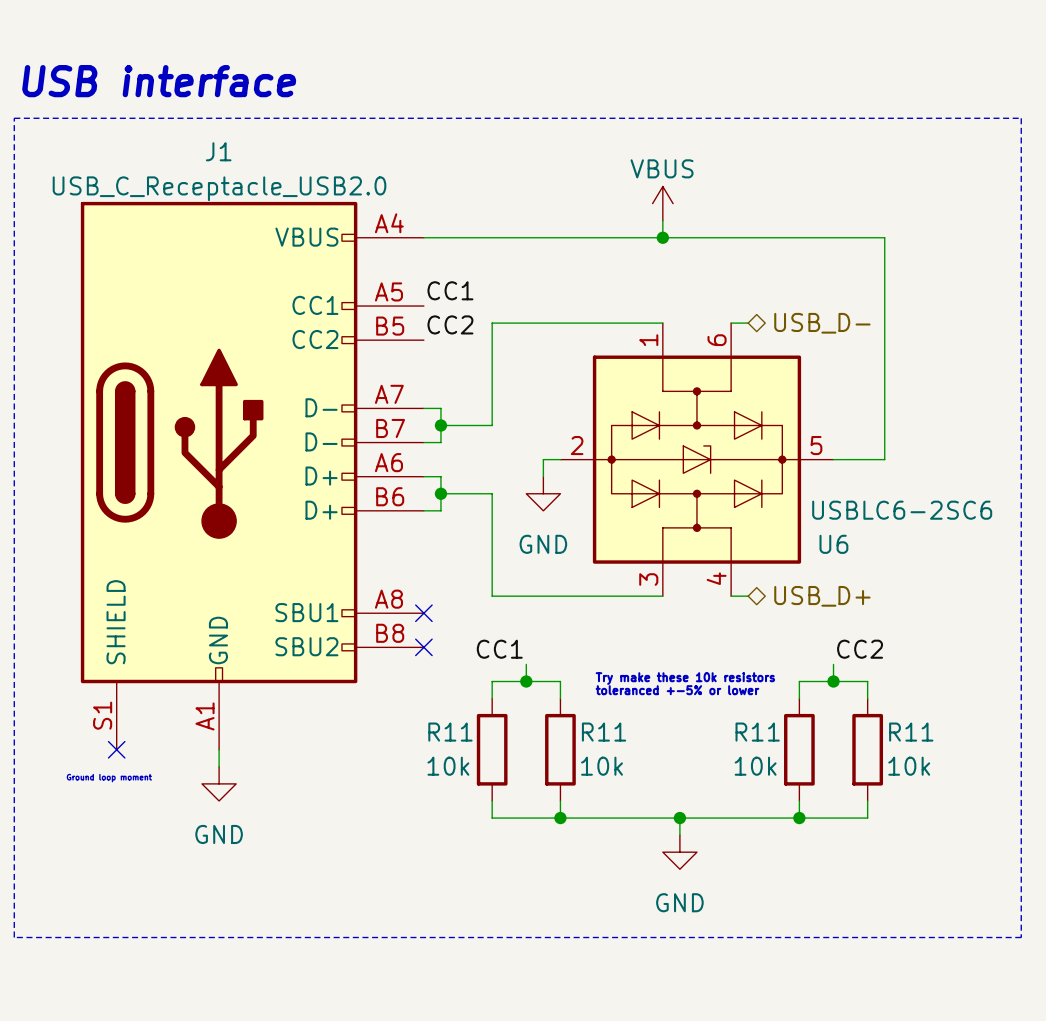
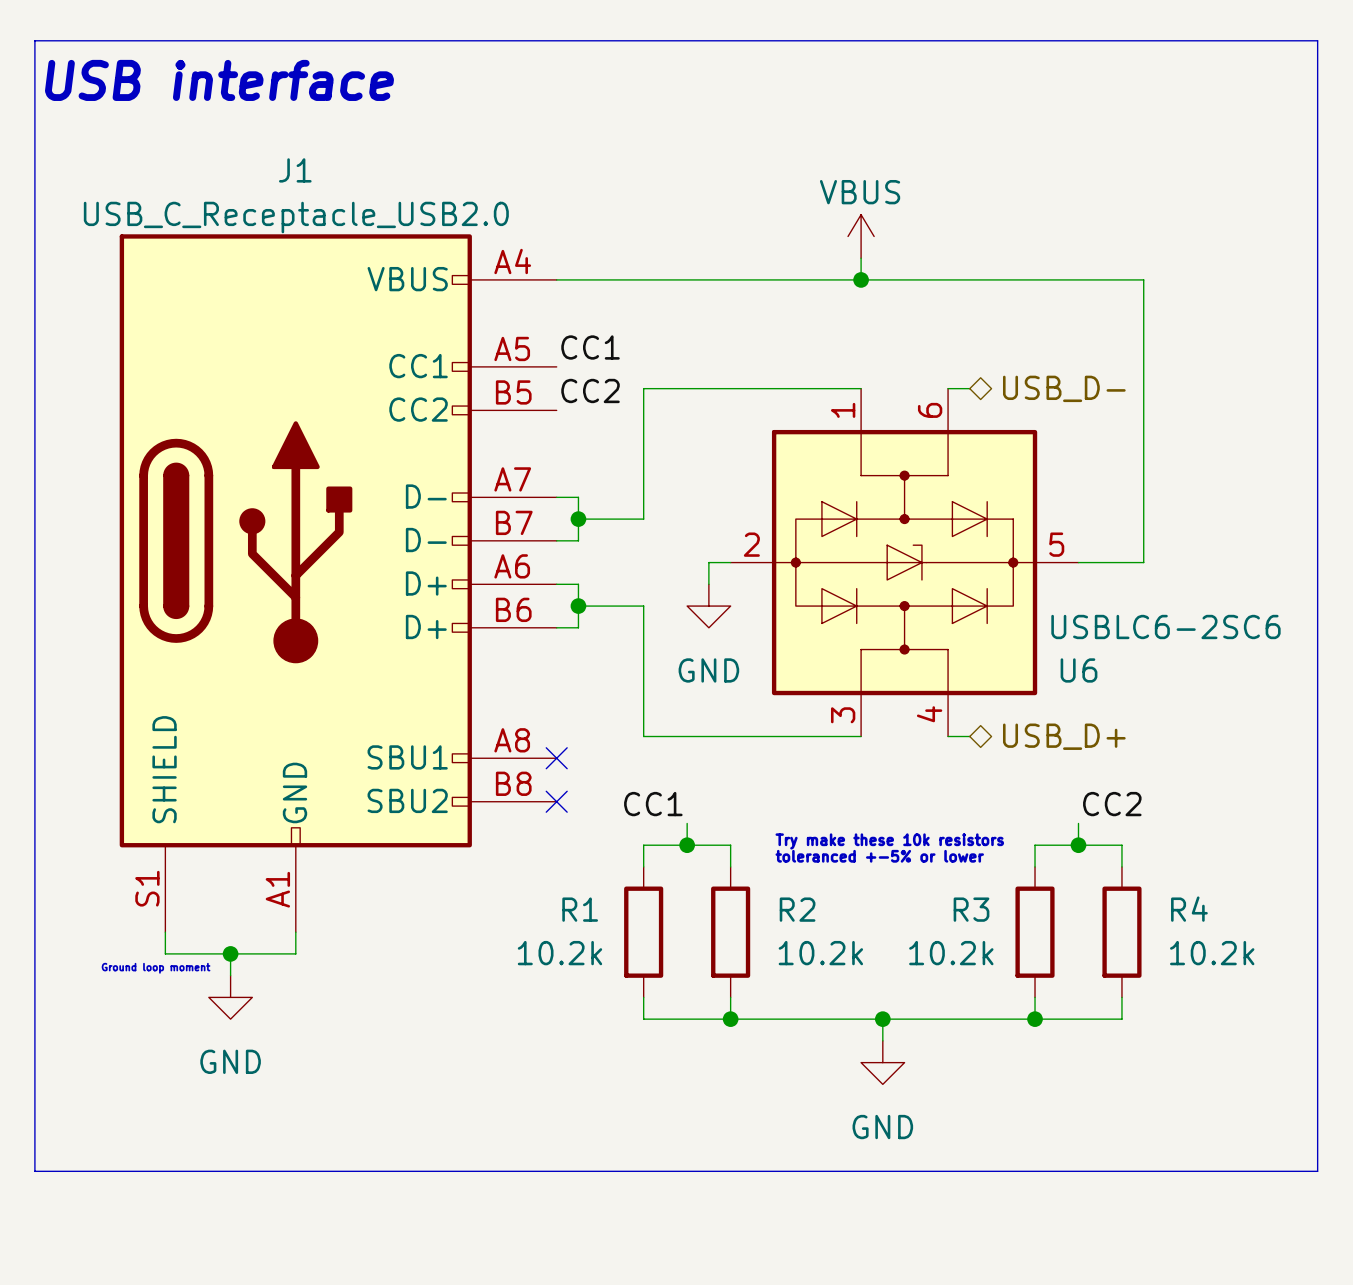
line: (14, 118) (1021, 118) (1021, 937) (14, 937) (14, 118) -> (34, 40) (34, 1171) (1317, 1171) (1317, 40) (34, 40)
R11 name: R11 (450, 732) -> R1 (580, 909)
R11 name: R11 (604, 732) -> R2 (797, 909)
R11 name: R11 (757, 732) -> R3 (971, 909)
R11 name: R11 (911, 732) -> R4 (1189, 909)
wire: none -> (165, 932) (165, 953) (295, 953)
no-connect mark: (116, 749) -> none
wire: none -> (230, 953) (230, 975)
junction: none -> (230, 953)
R11 value: 10k (448, 766) -> 10.2k (559, 953)
R11 value: 10k (602, 766) -> 10.2k (820, 953)
R11 value: 10k (755, 766) -> 10.2k (951, 953)
R11 value: 10k (909, 766) -> 10.2k (1212, 953)
power symbol position: GND (219, 783) -> GND (230, 997)

